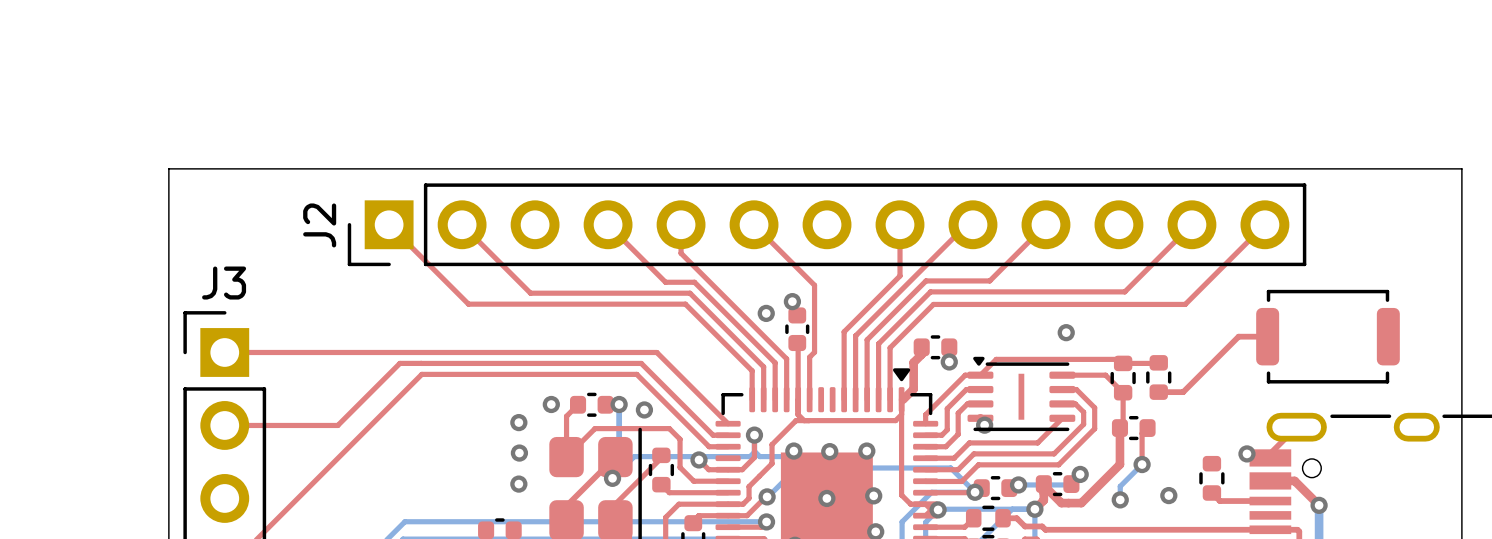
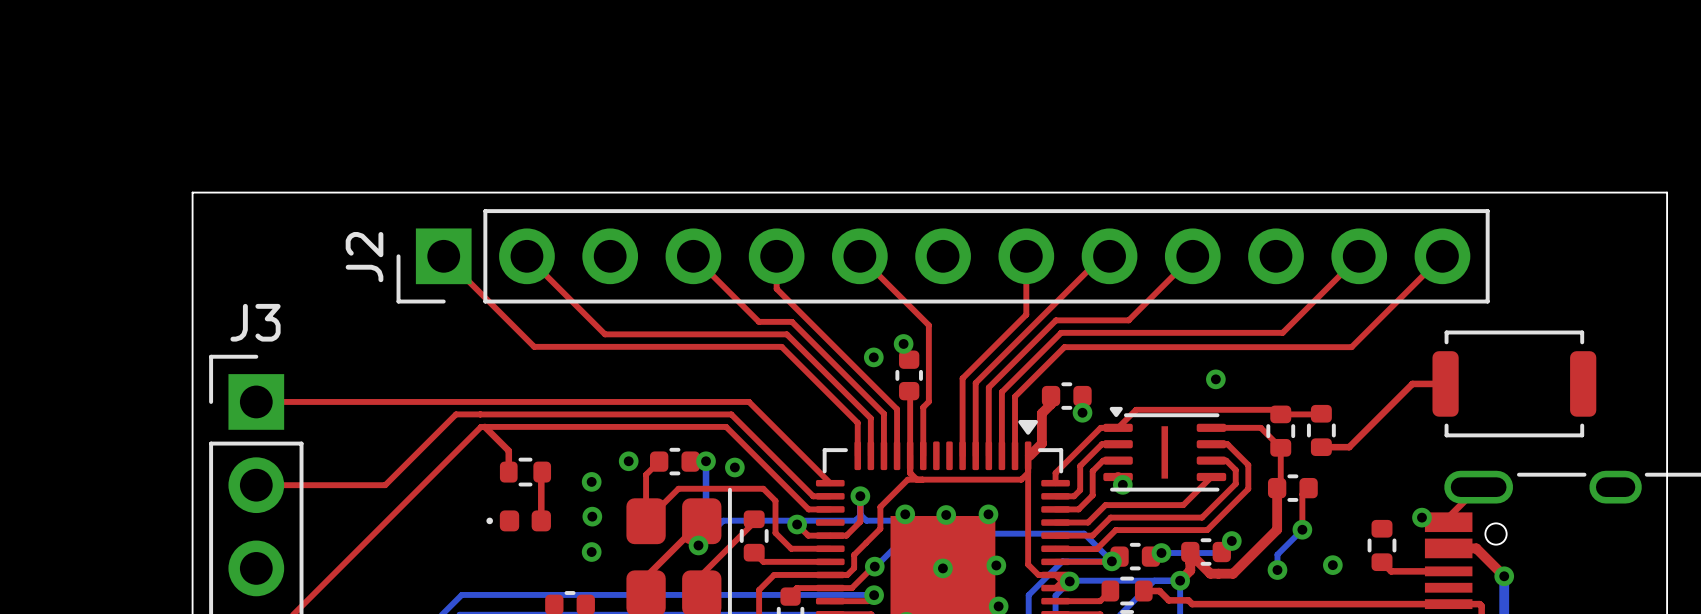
top track: none -> (484, 426) (508, 450) (508, 472)
part: none -> (525, 472)
top track: none -> (542, 472) (541, 520)
part: none -> (518, 520)

